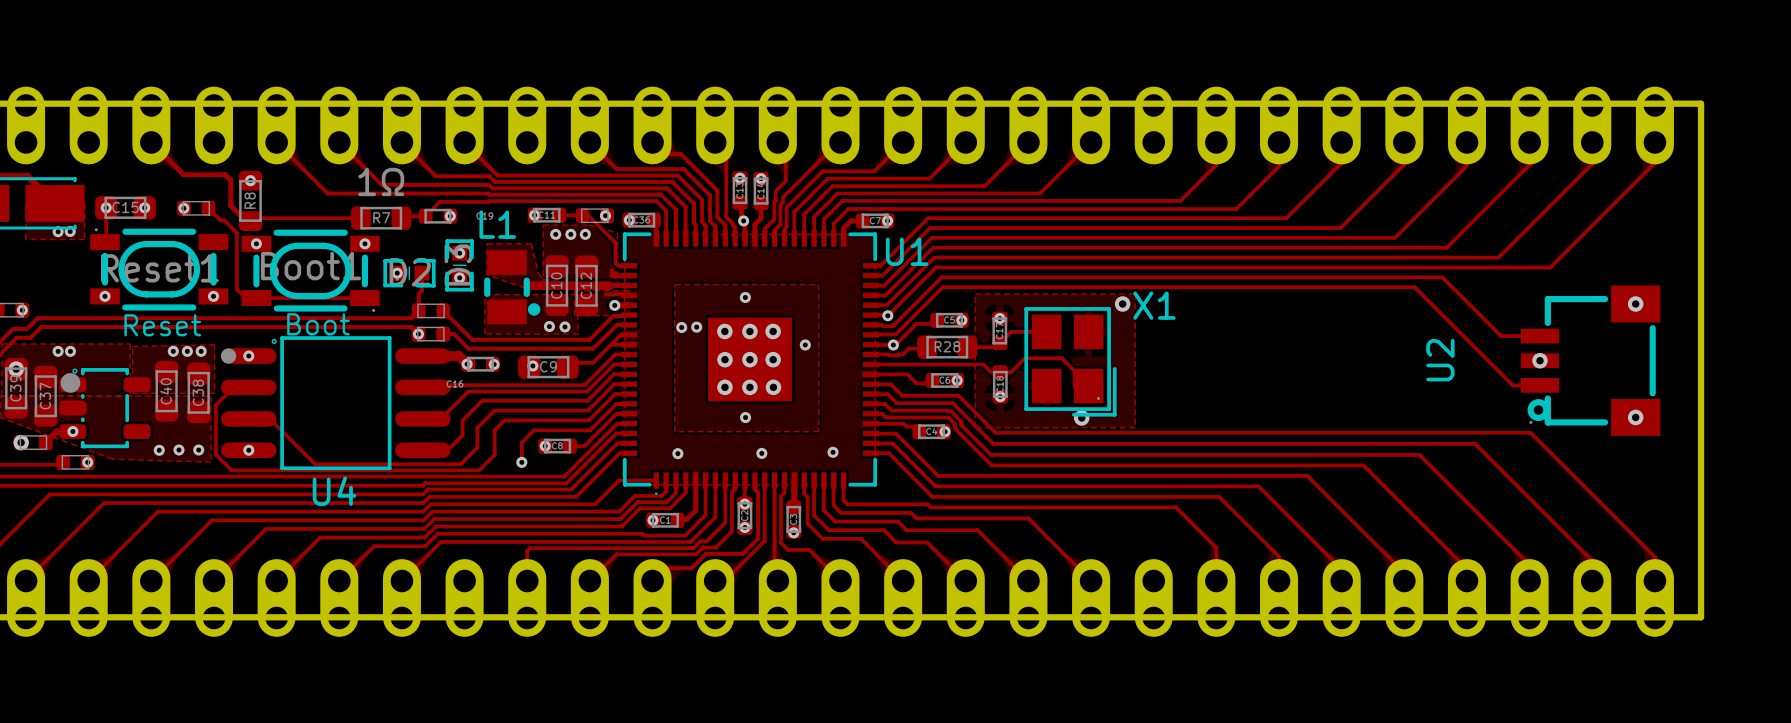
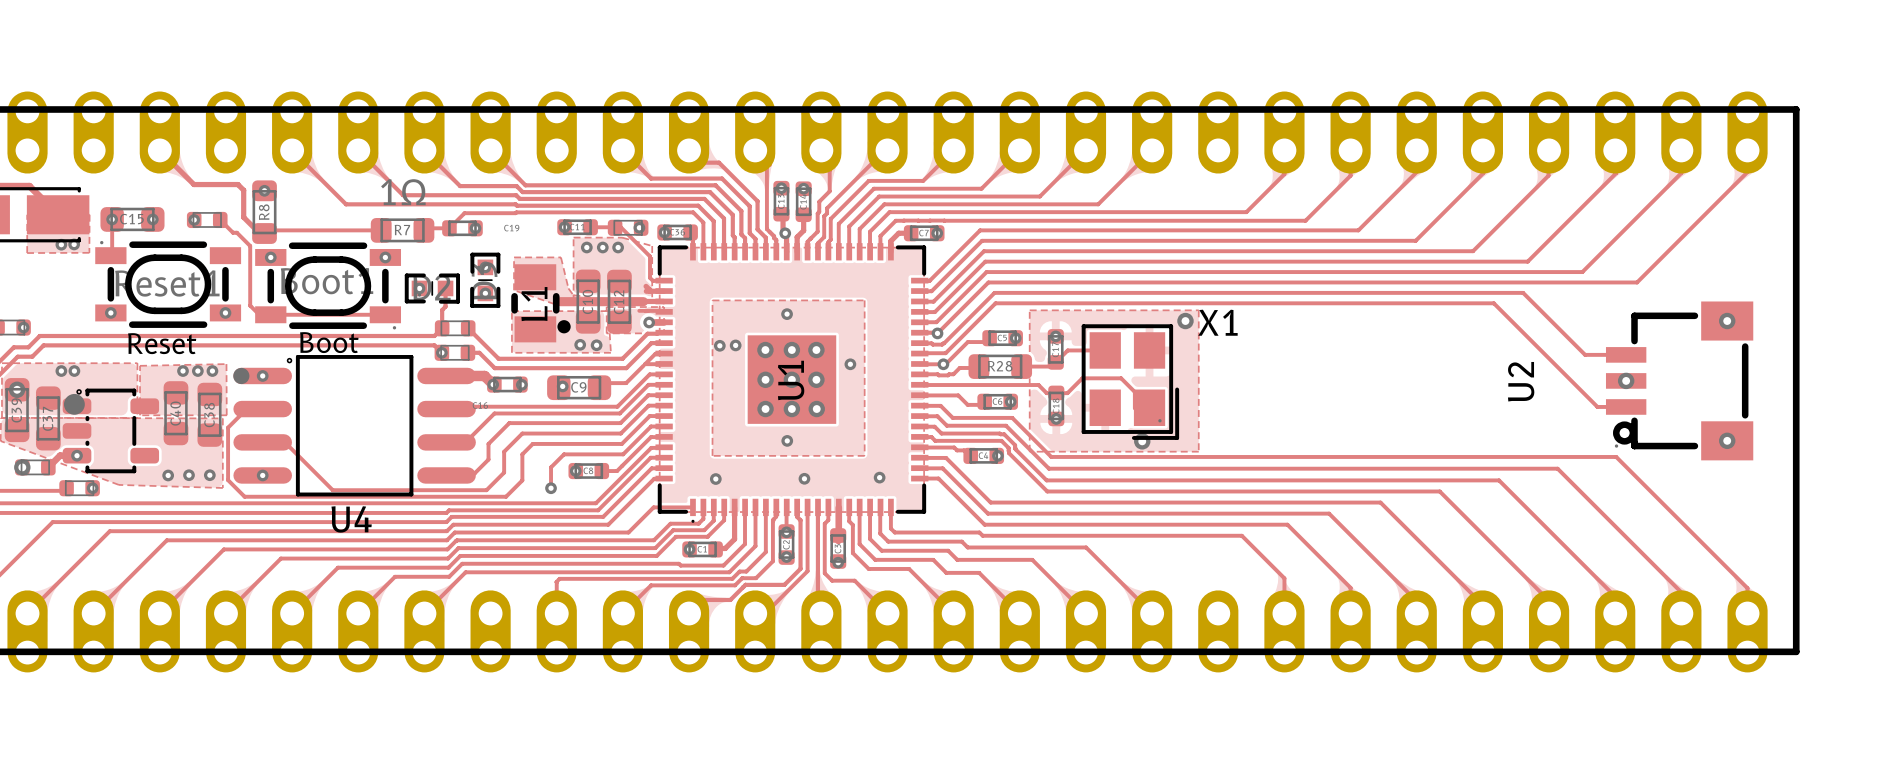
L1 name rotation: 0° (497, 224) -> 90° counterclockwise (534, 304)
L1 name position: L1 (497, 224) -> L1 (534, 304)
U1 name rotation: 0° (907, 251) -> 90° counterclockwise (791, 380)
U1 name position: U1 (907, 251) -> U1 (791, 380)

